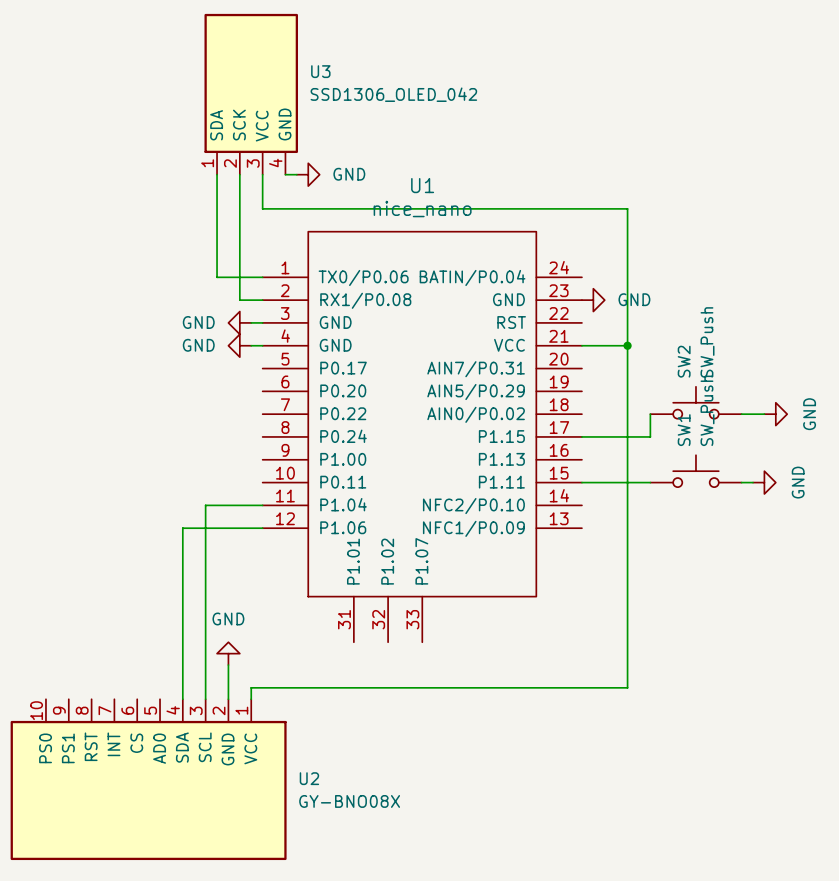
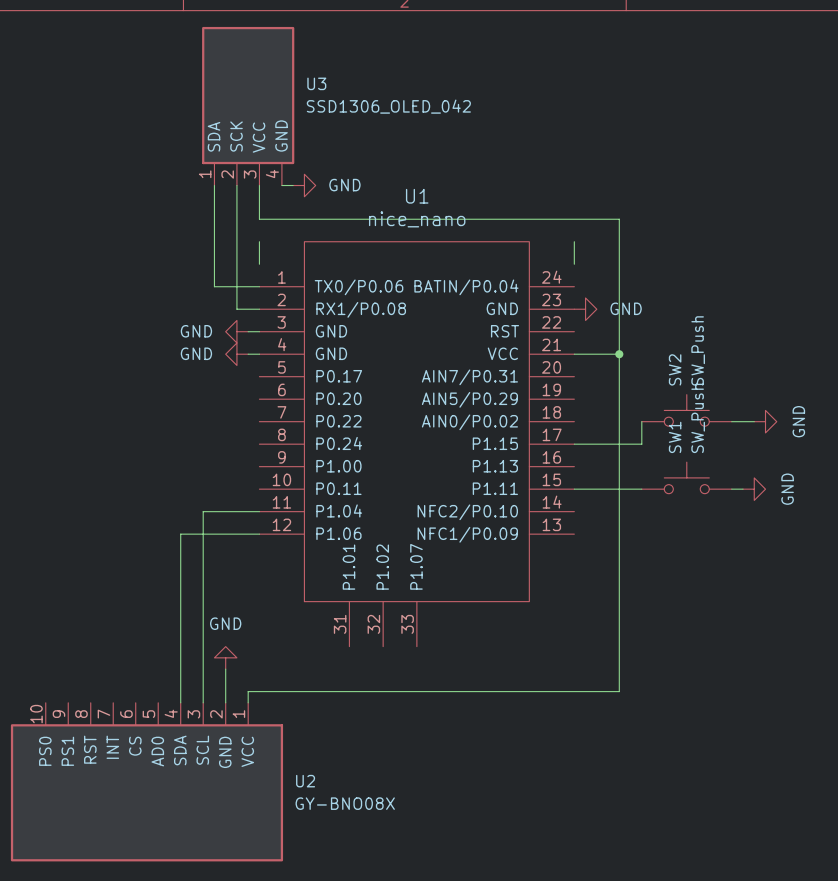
wire: none -> (259, 241) (259, 264)
wire: none -> (574, 241) (574, 264)

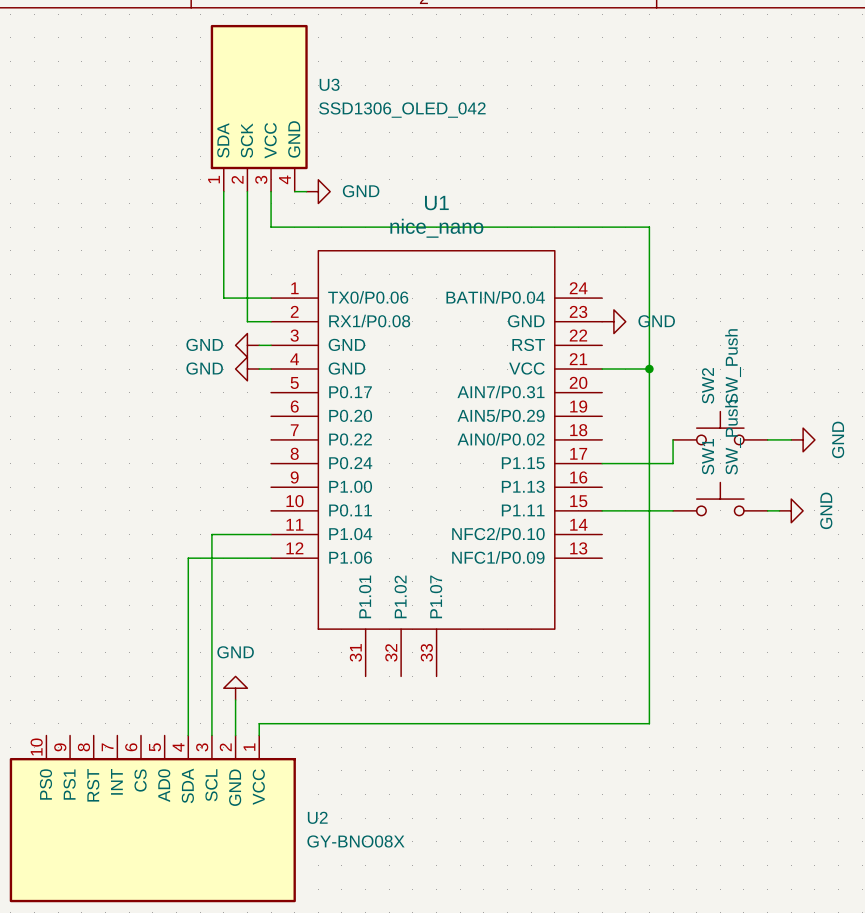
wire: (259, 241) (259, 264) -> none
wire: (574, 241) (574, 264) -> none

